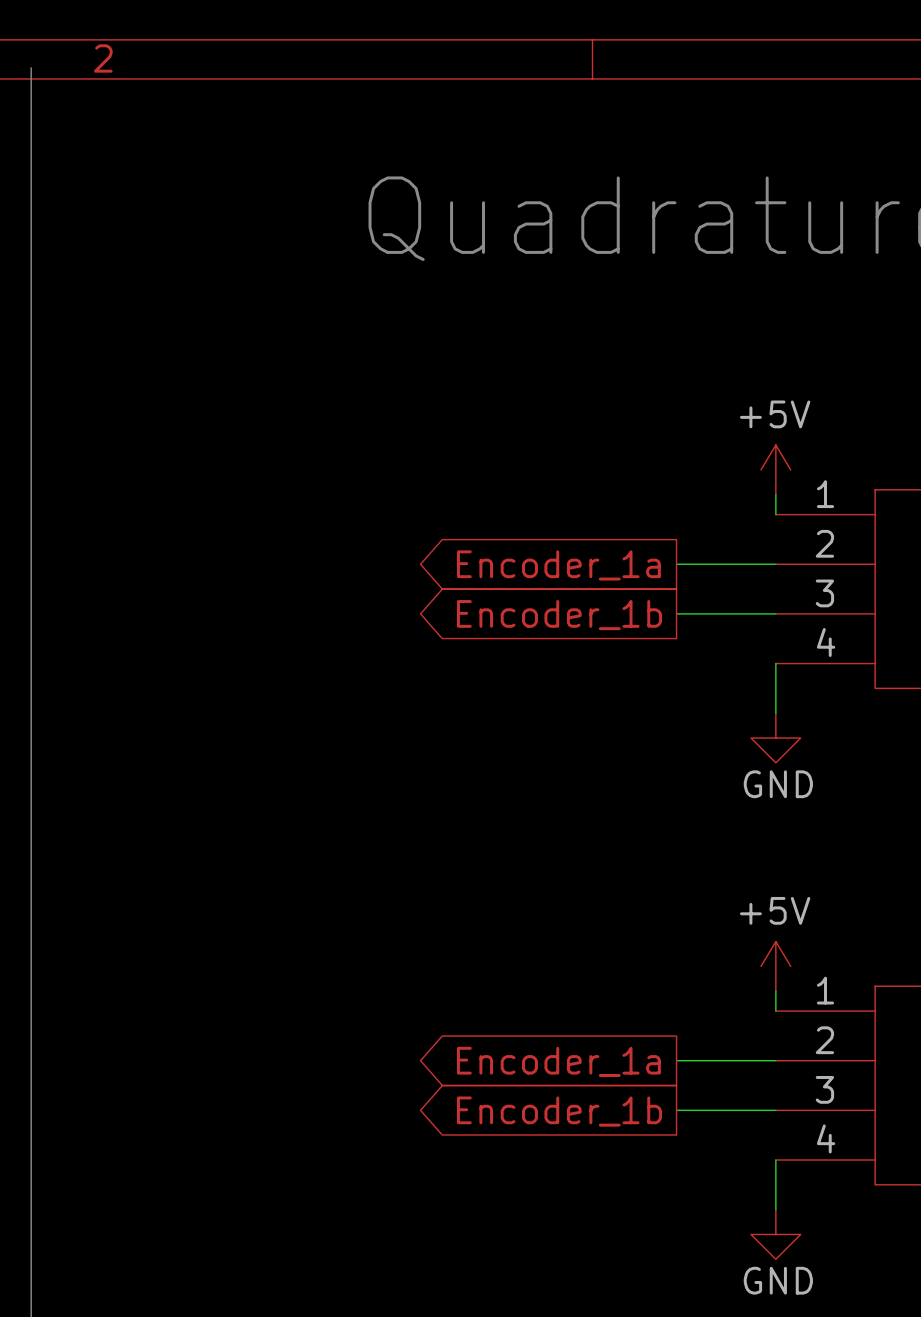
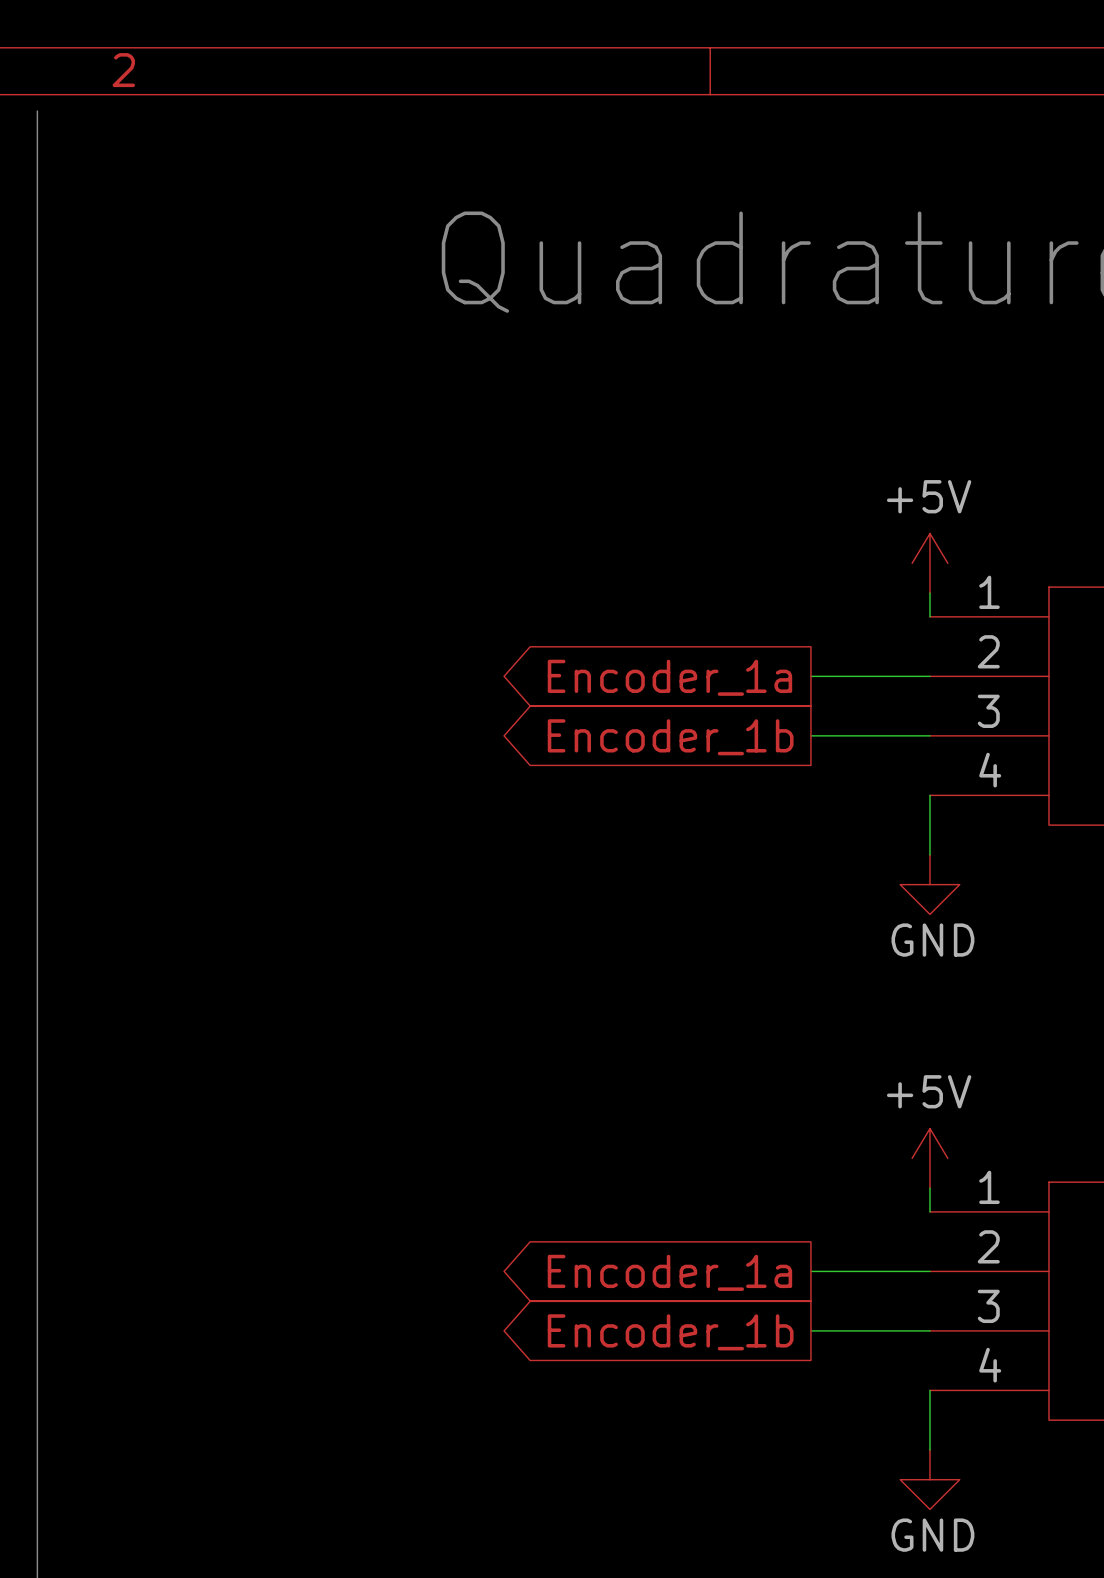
line: (31, 67) (31, 92) -> none

